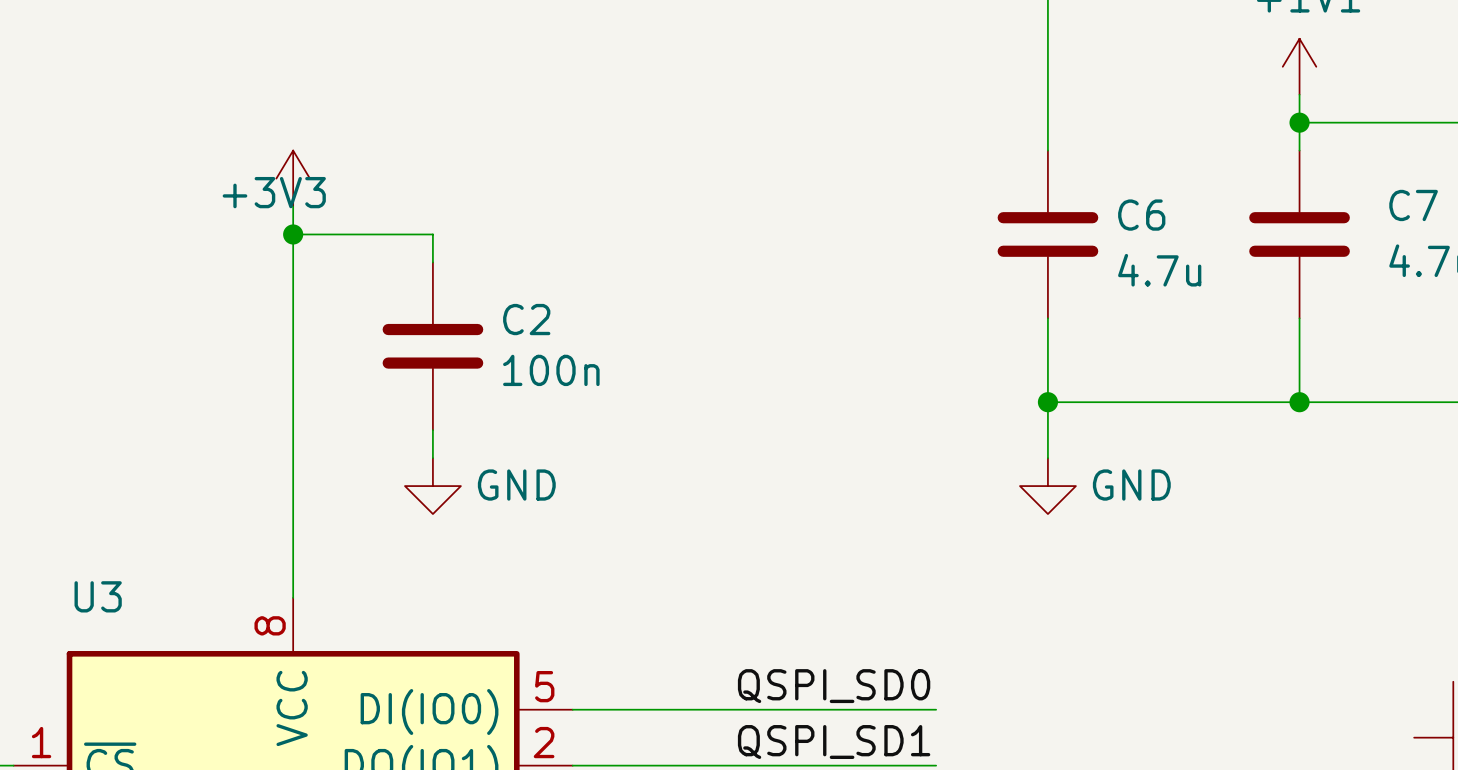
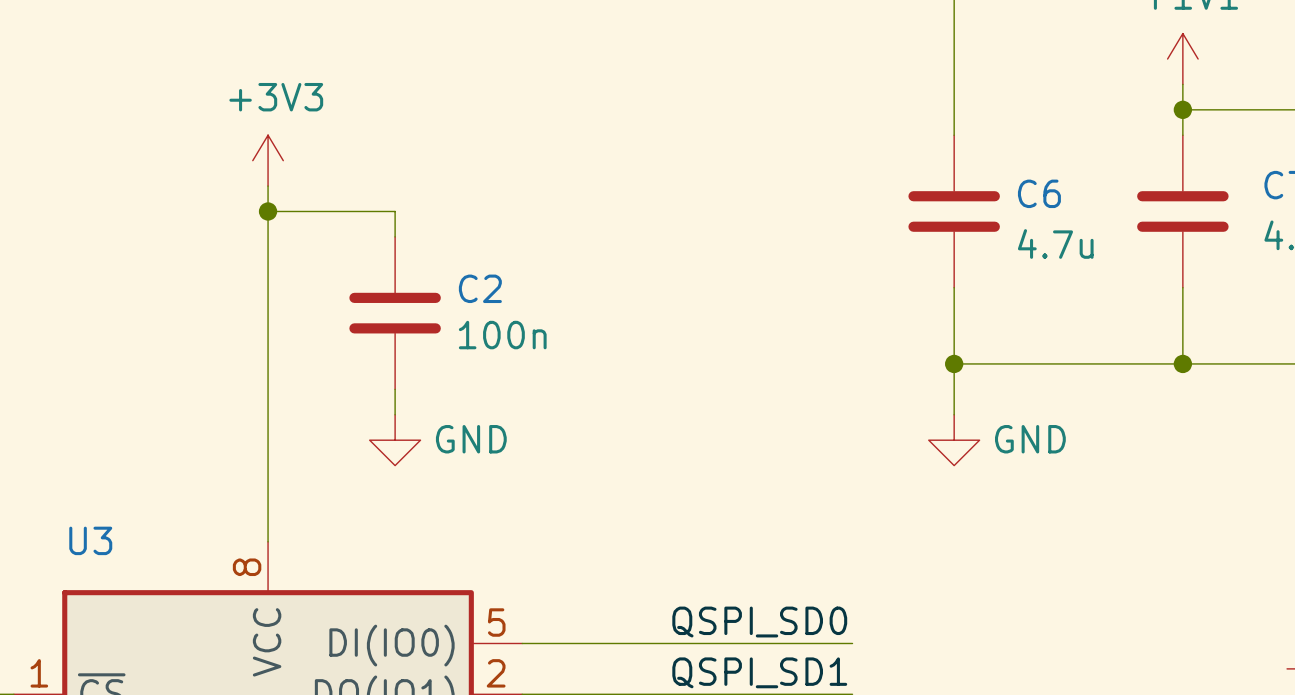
power symbol text position: +3V3 (274, 192) -> +3V3 (276, 97)

